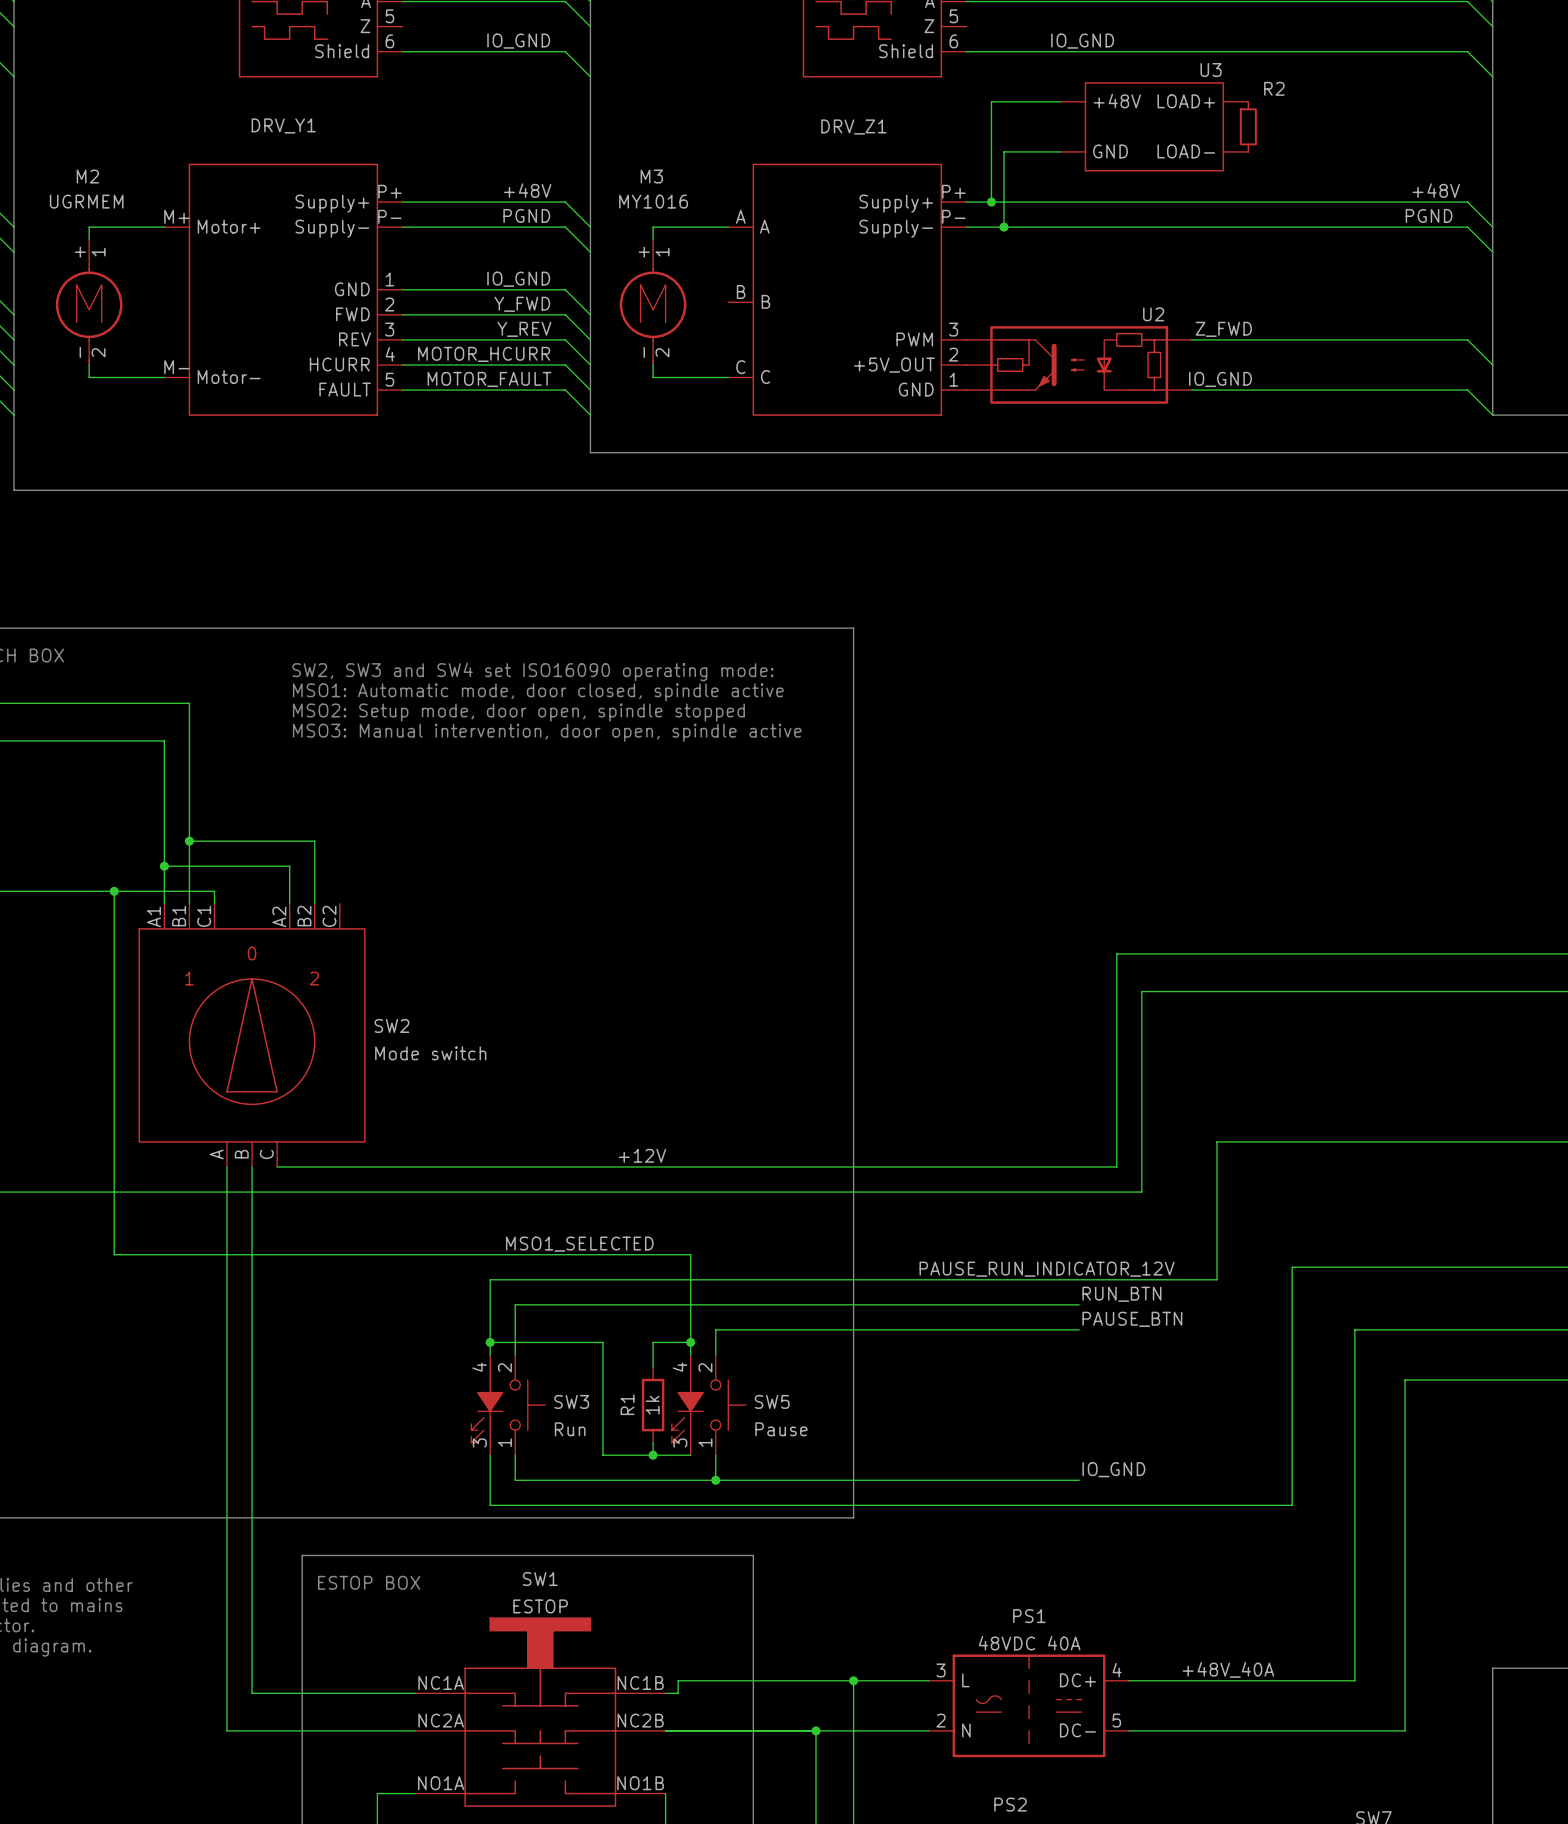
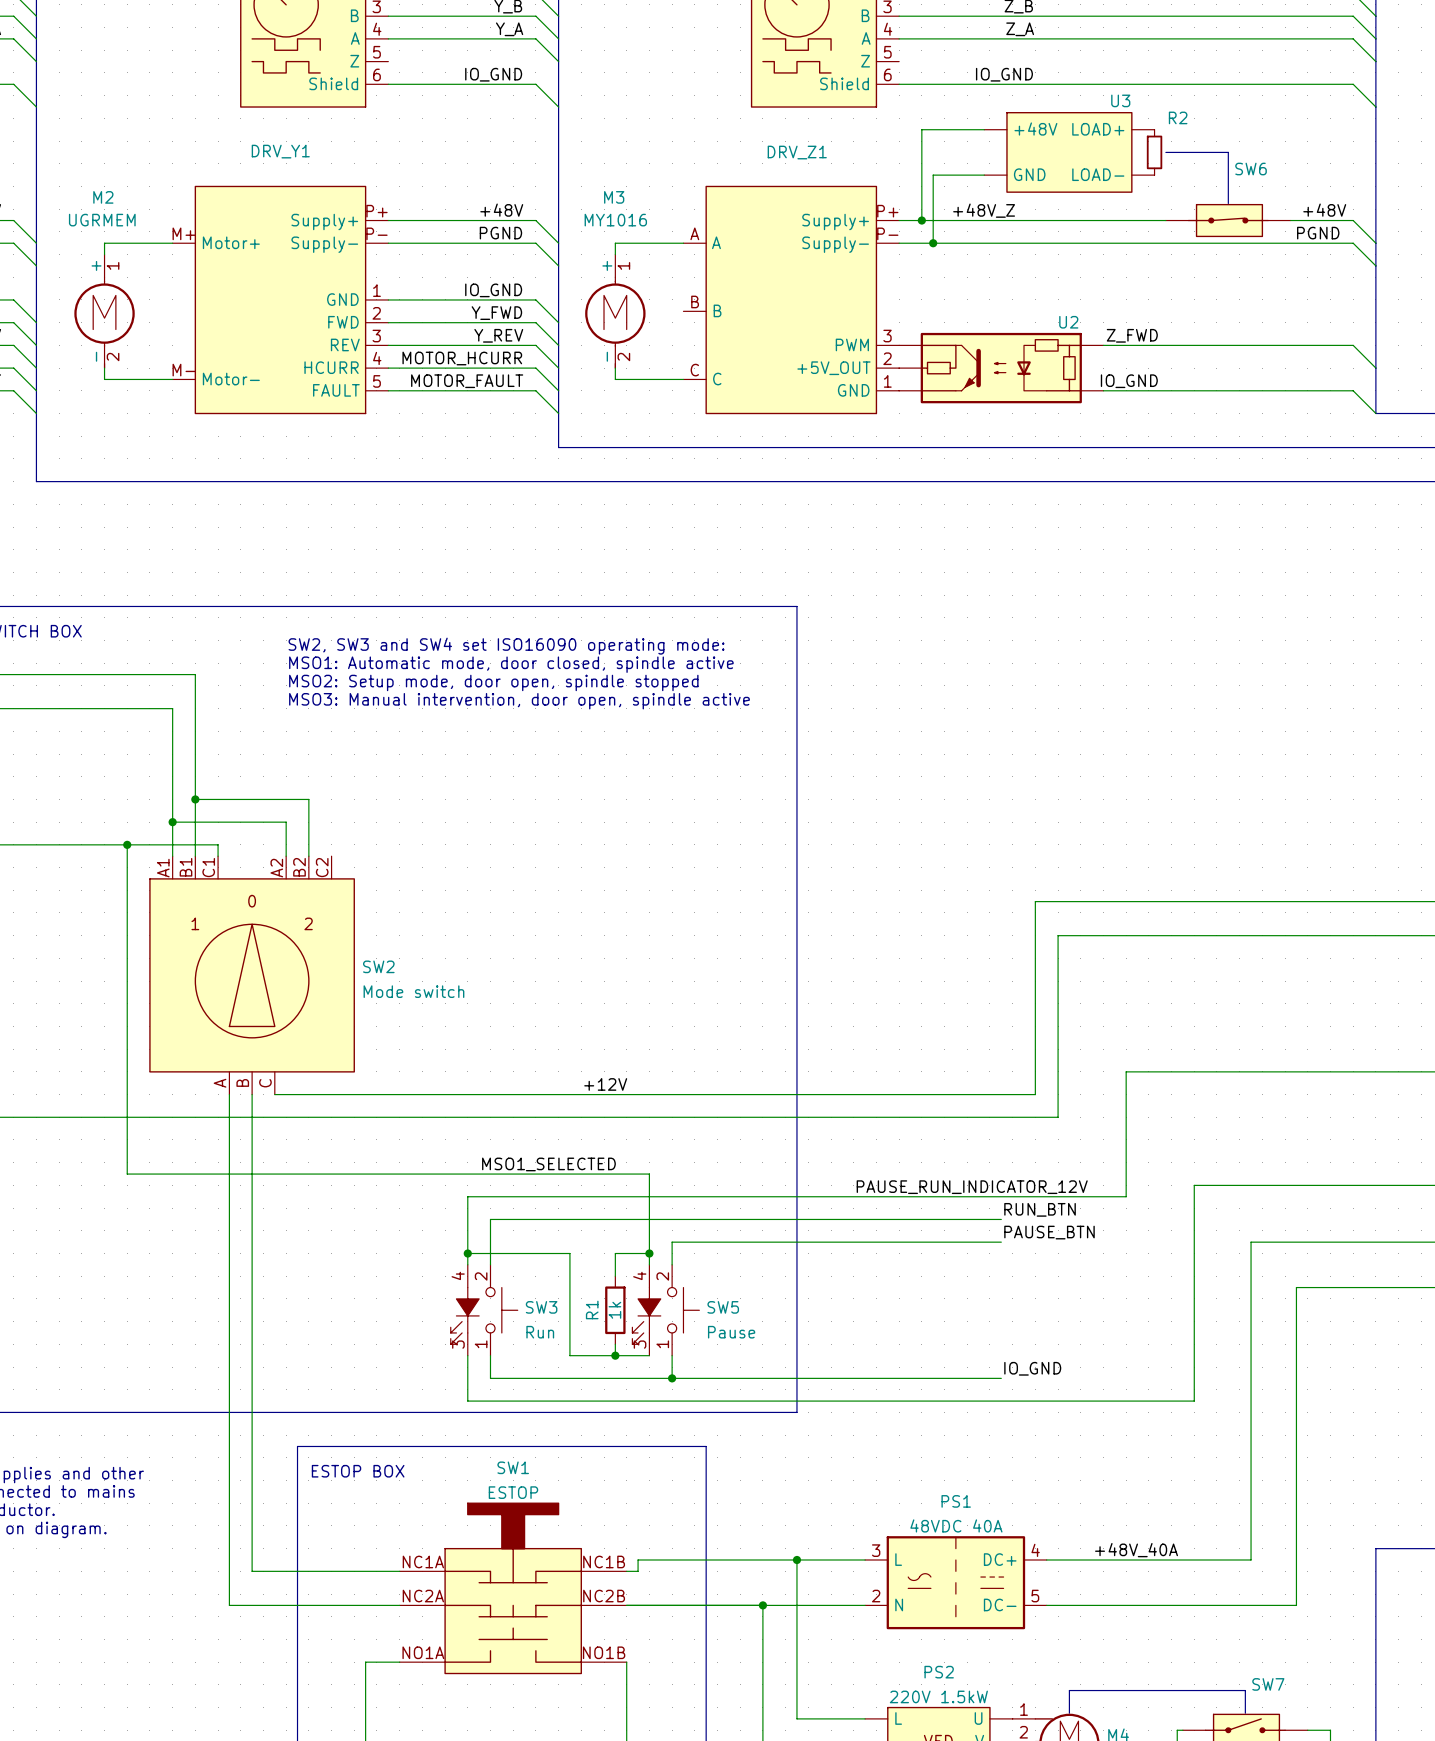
line: none -> (1165, 152) (1228, 152) (1228, 203)
label: none -> +48V_Z (984, 210)
SW6: none -> (1228, 220)

